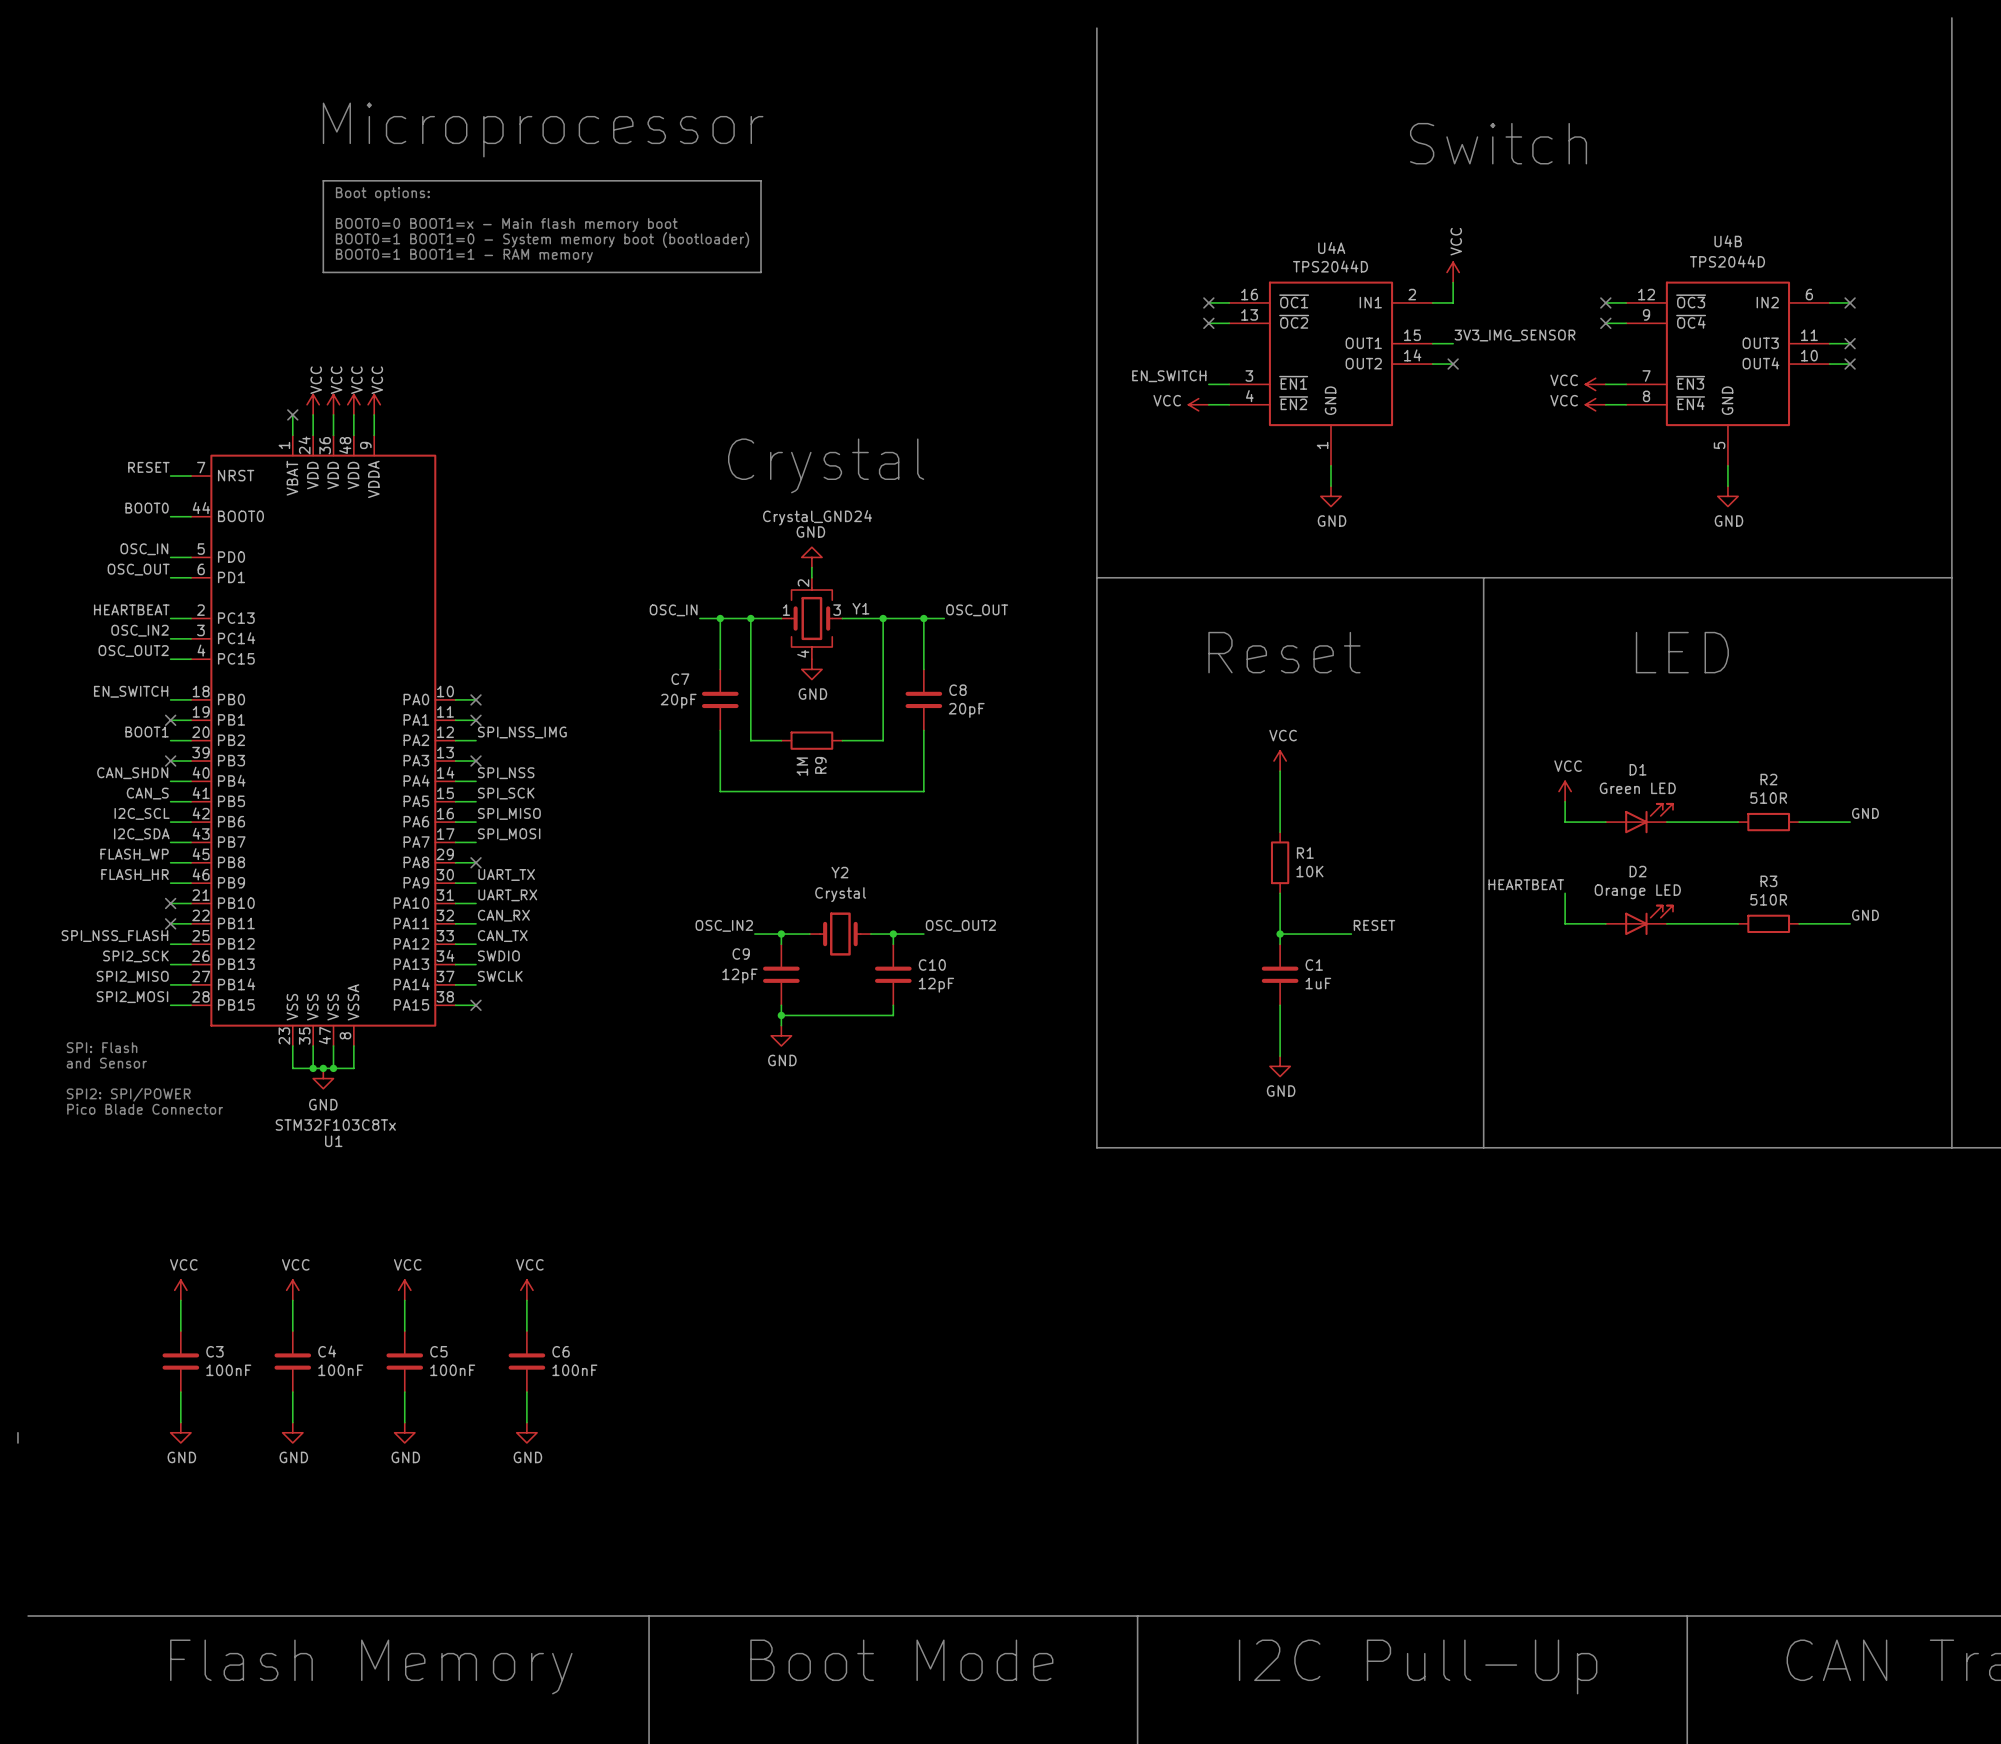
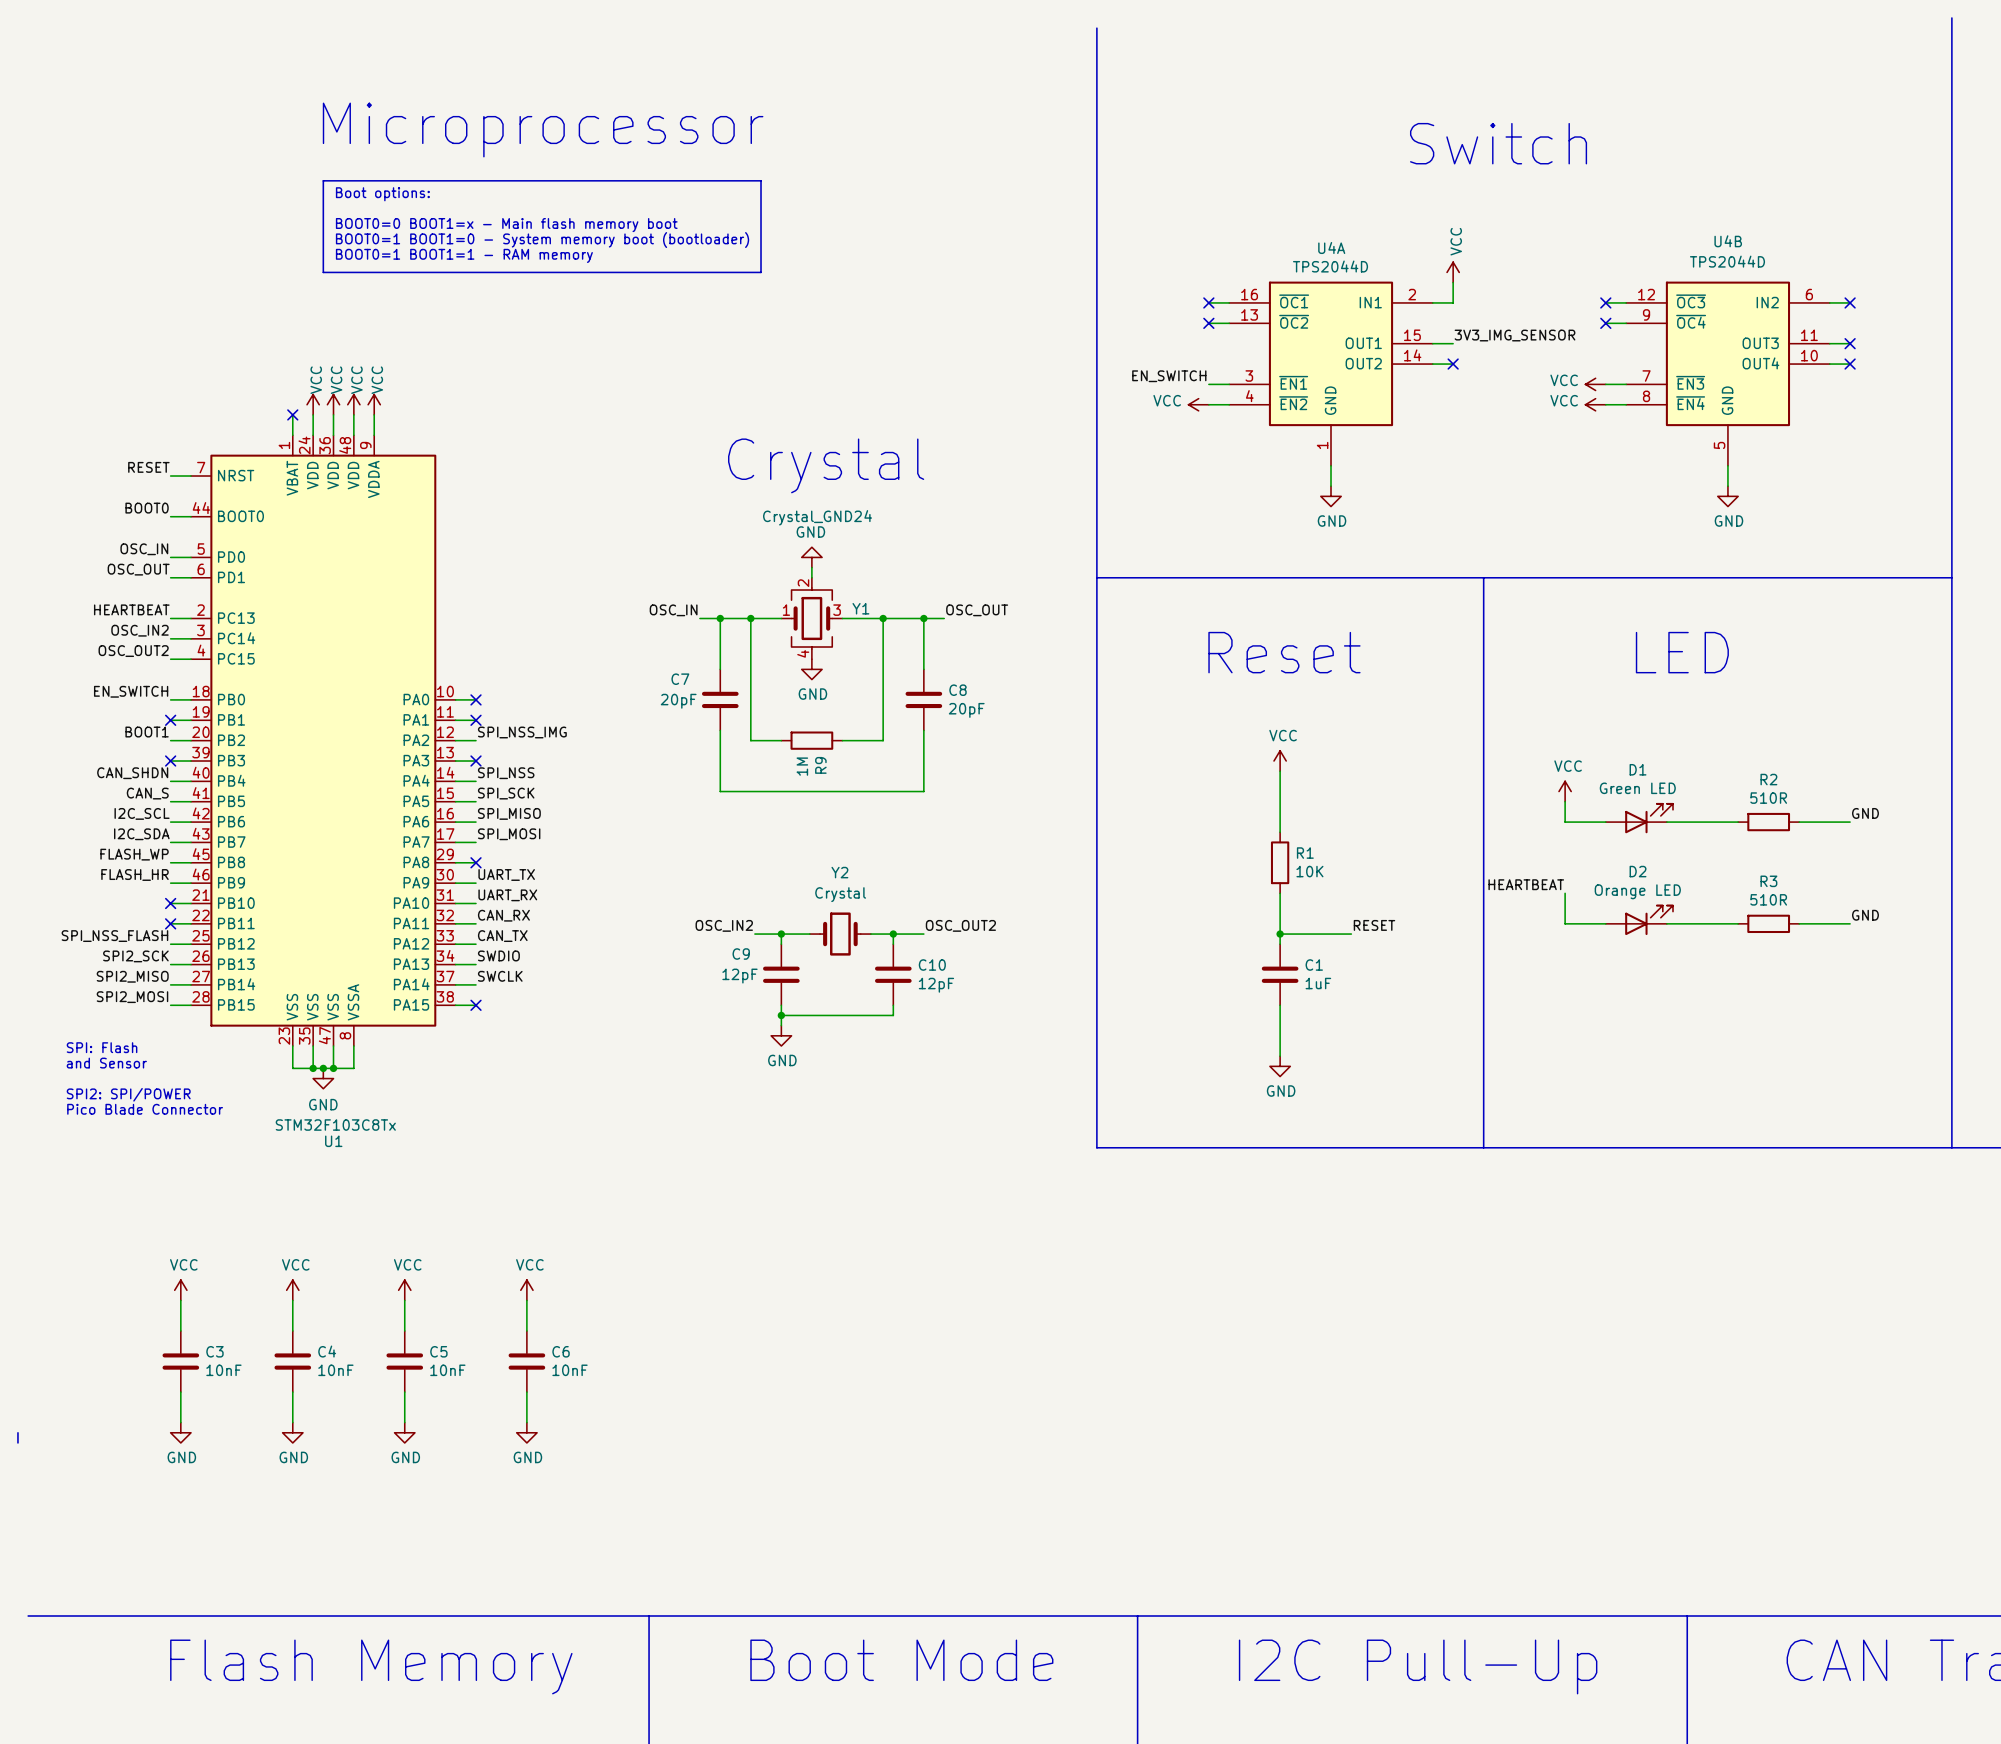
C3 value: 100nF (228, 1370) -> 10nF (223, 1370)
C4 value: 100nF (340, 1370) -> 10nF (335, 1370)
C5 value: 100nF (452, 1370) -> 10nF (447, 1370)
C6 value: 100nF (574, 1370) -> 10nF (570, 1370)

